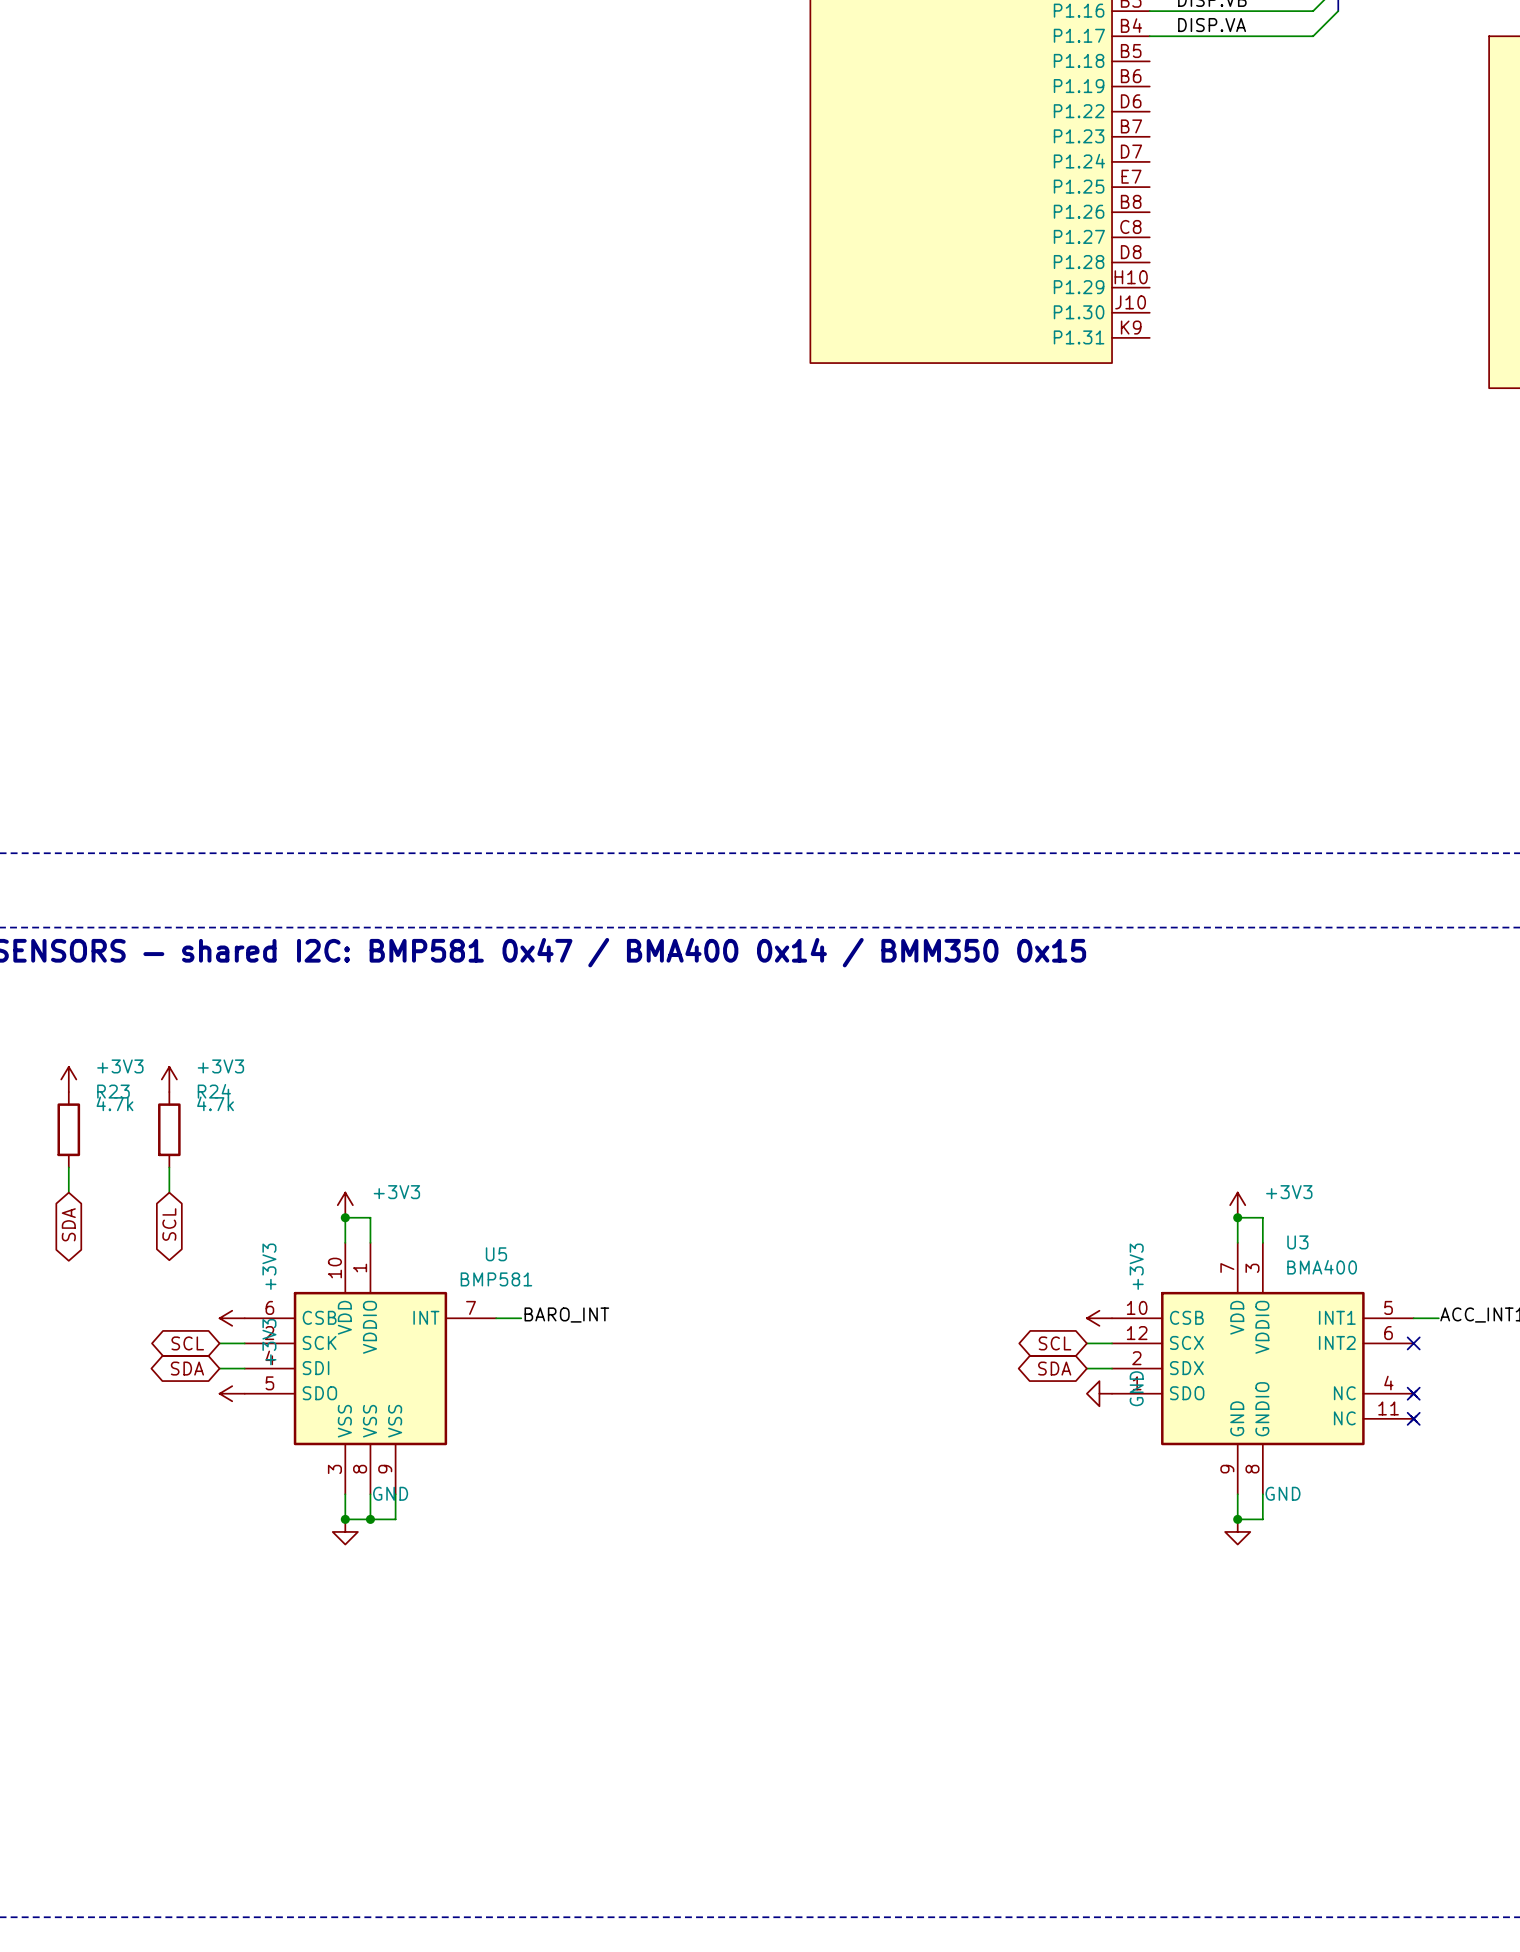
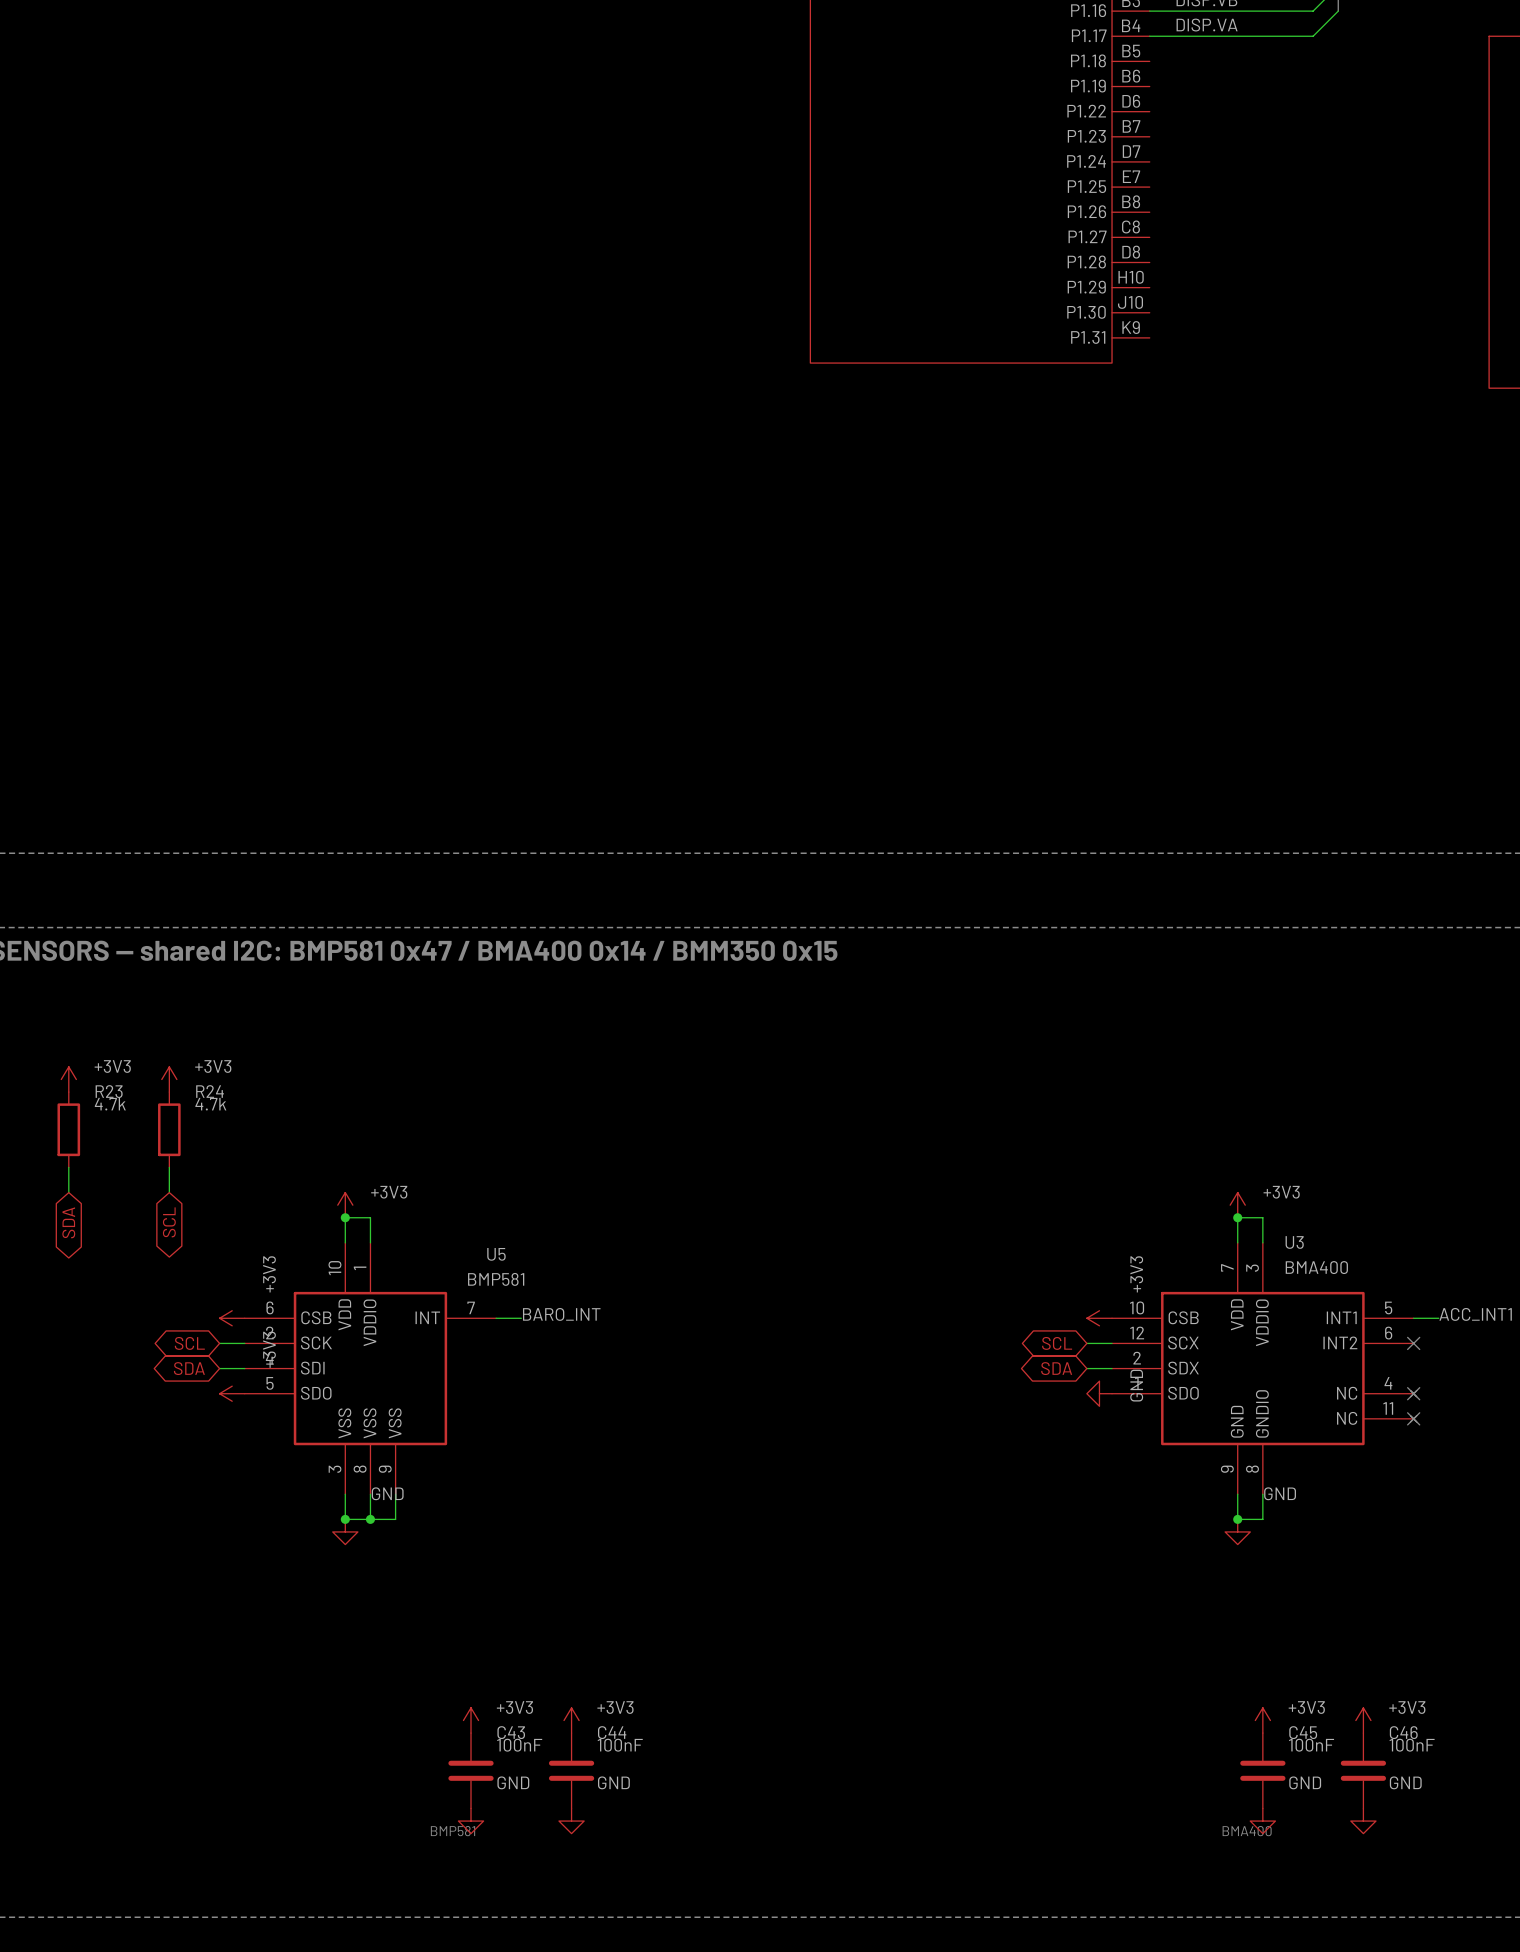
power symbol: none -> +3V3 (471, 1720)
power symbol: none -> +3V3 (571, 1720)
power symbol: none -> +3V3 (1262, 1720)
power symbol: none -> +3V3 (1363, 1720)
C43: none -> 100nF (471, 1770)
C44: none -> 100nF (571, 1770)
C45: none -> 100nF (1262, 1770)
C46: none -> 100nF (1363, 1770)
power symbol: none -> GND (471, 1821)
power symbol: none -> GND (571, 1821)
power symbol: none -> GND (1262, 1821)
power symbol: none -> GND (1363, 1821)
text: none -> BMA400 (1247, 1831)
text: none -> BMP581 (453, 1831)

